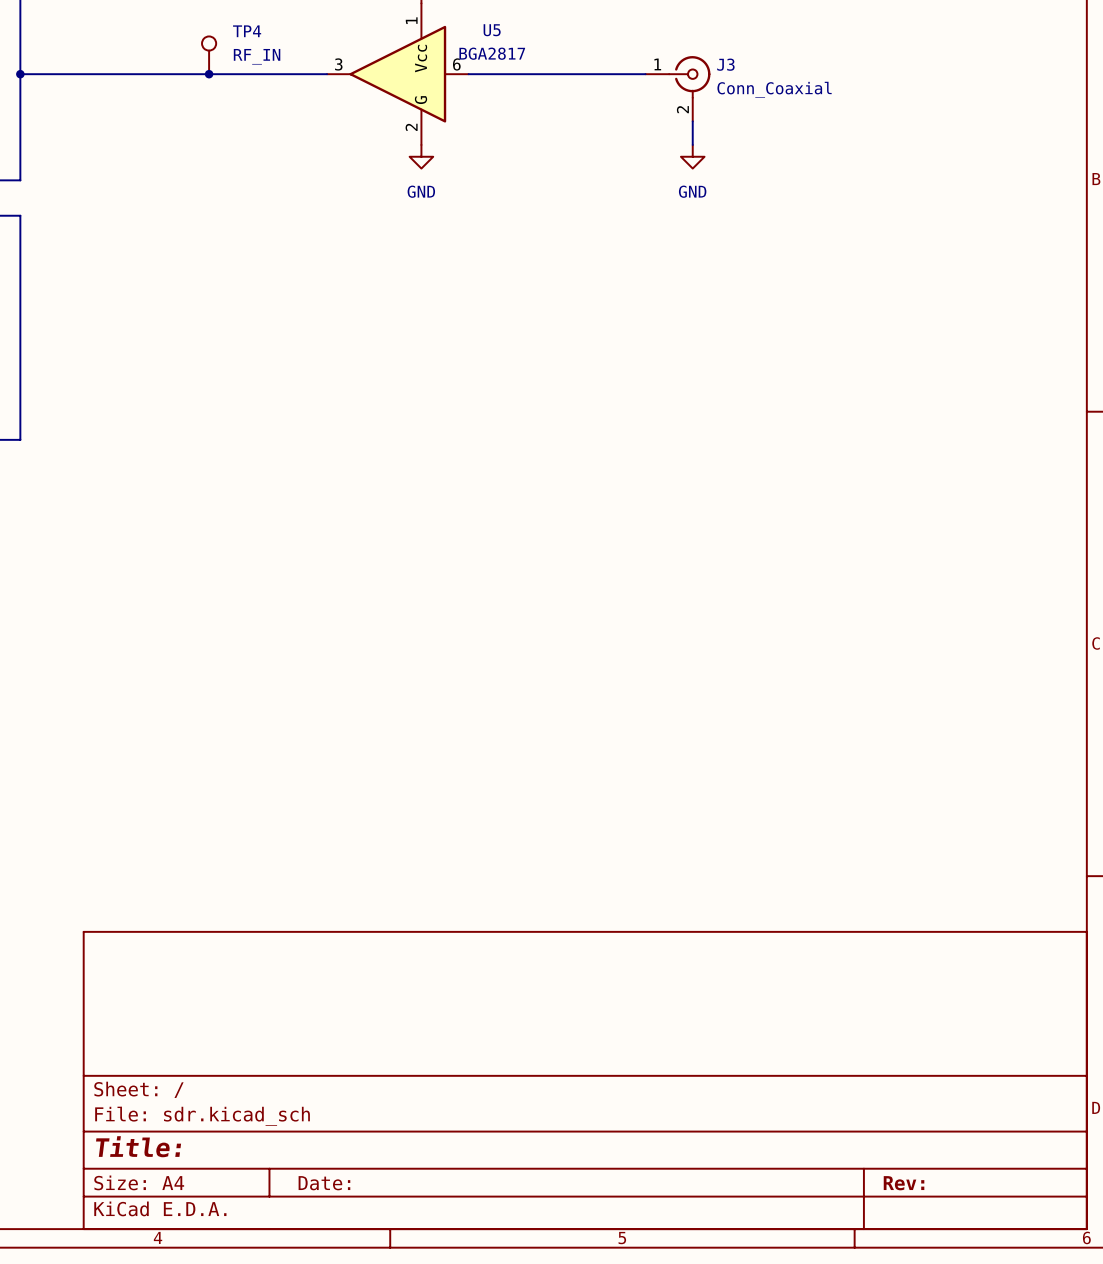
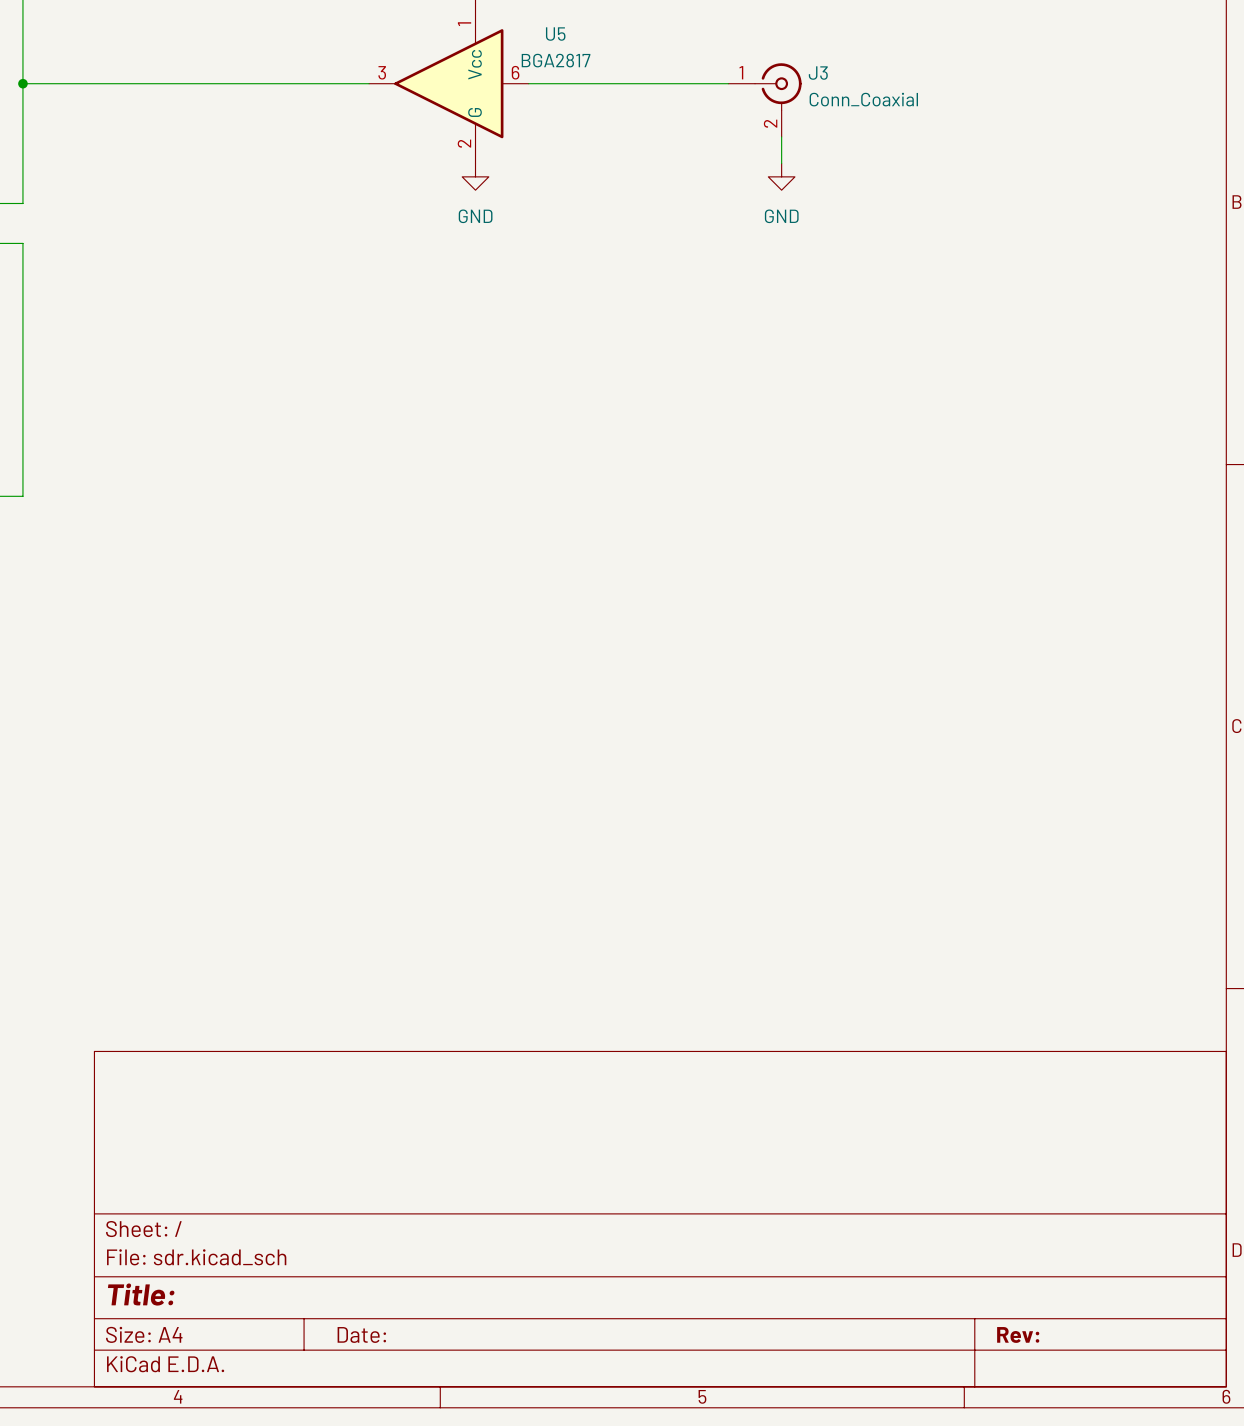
TP4: RF_IN (209, 55) -> none
junction: (209, 74) -> none

